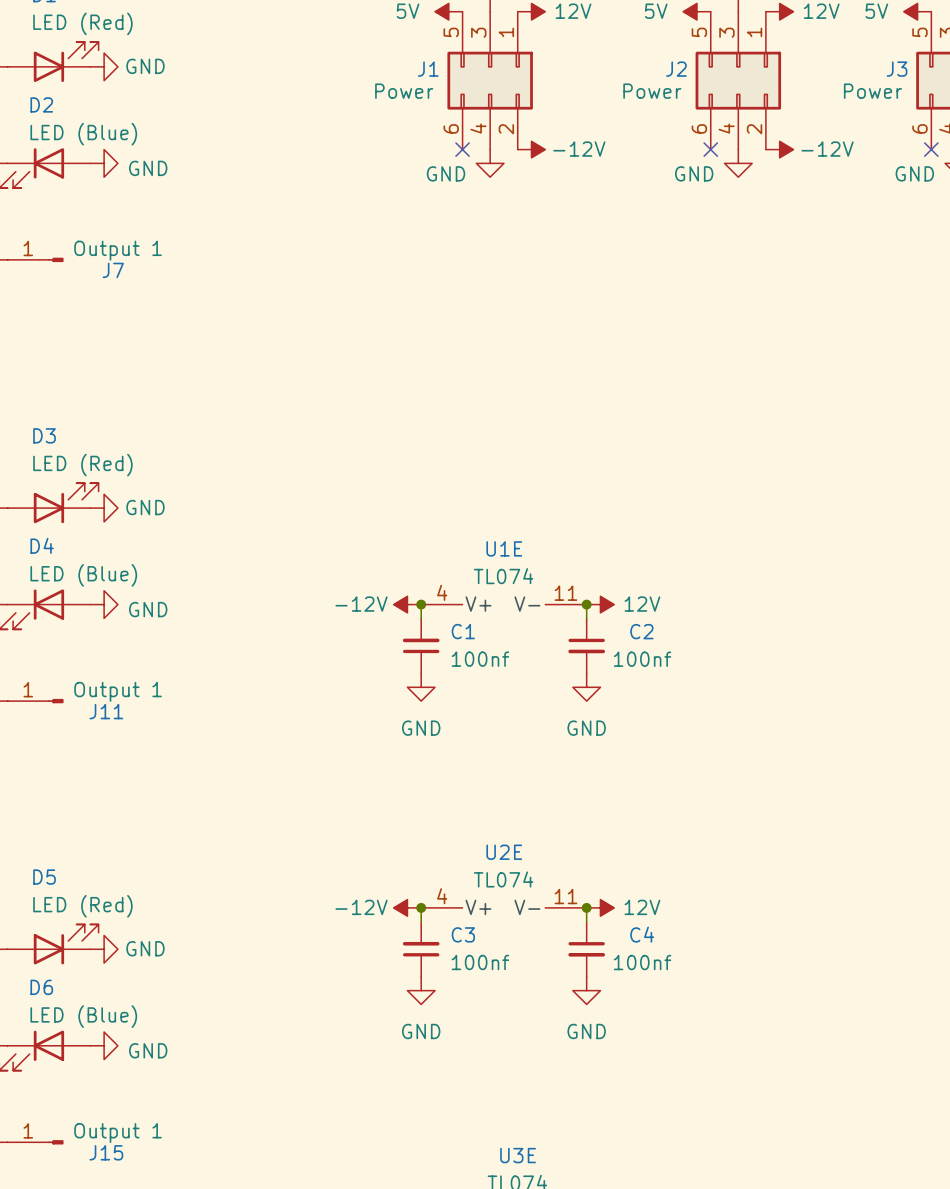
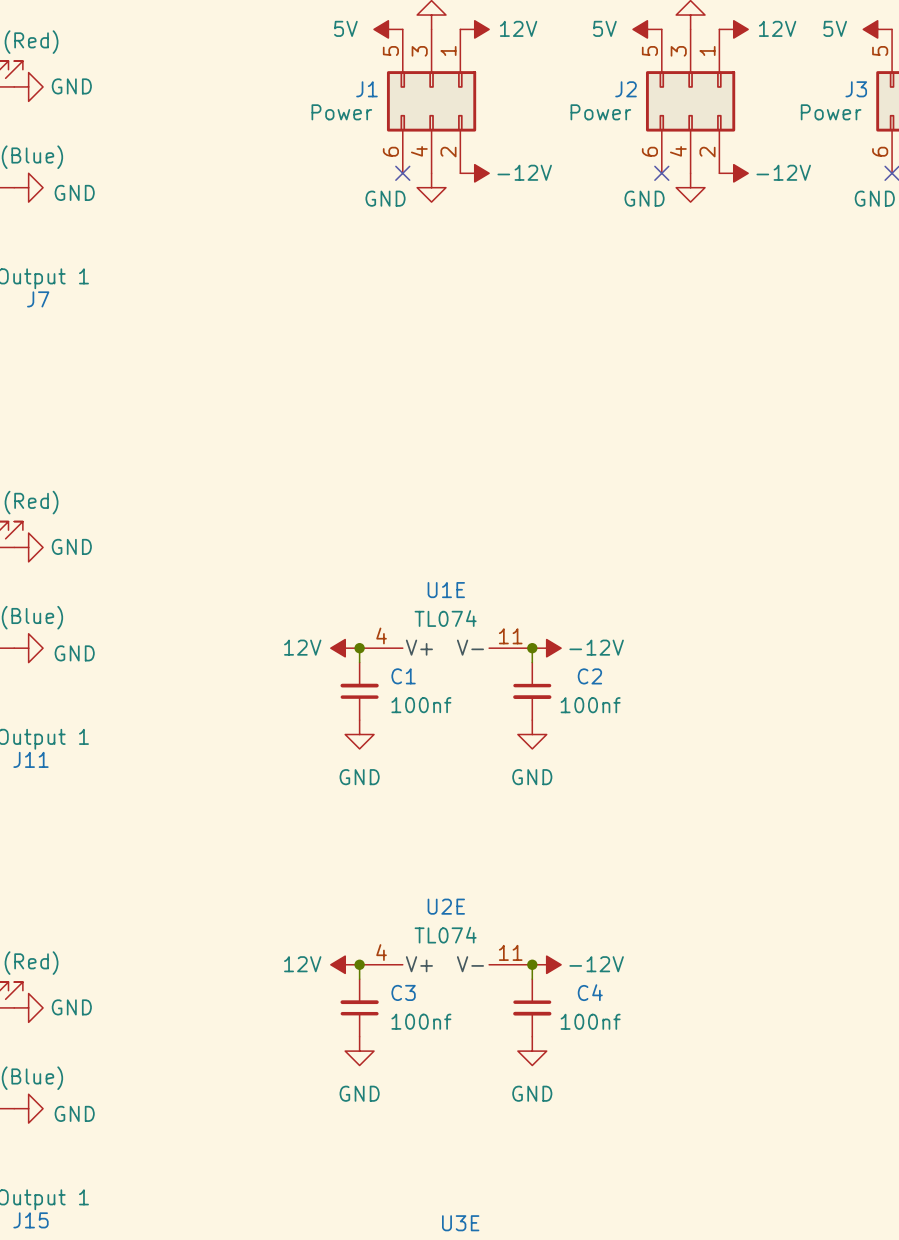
power symbol: -12V (407, 604) -> 12V (345, 648)
power symbol: 12V (600, 604) -> -12V (546, 648)
power symbol: -12V (407, 907) -> 12V (345, 964)
power symbol: 12V (600, 907) -> -12V (546, 964)

